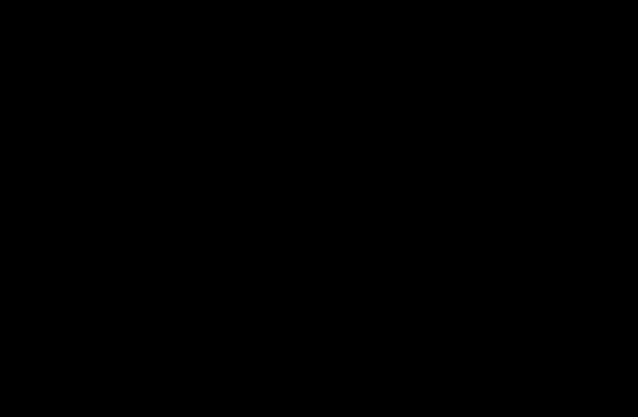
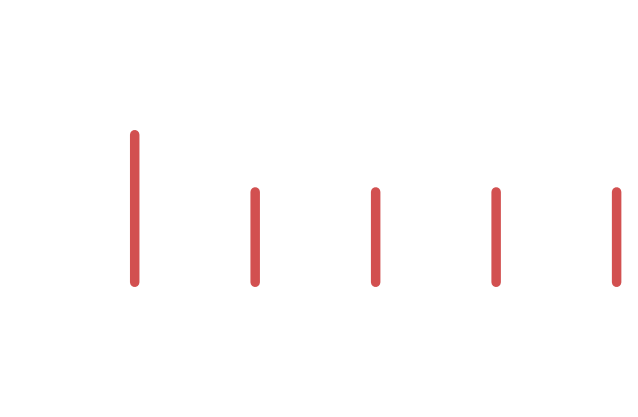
top track: none -> (134, 134) (134, 282)
top track: none -> (255, 191) (255, 282)
top track: none -> (375, 191) (375, 282)
top track: none -> (496, 191) (496, 282)
top track: none -> (616, 191) (616, 282)

